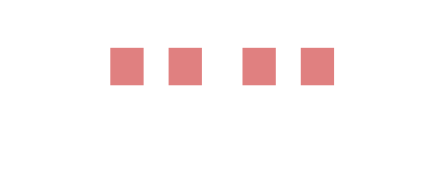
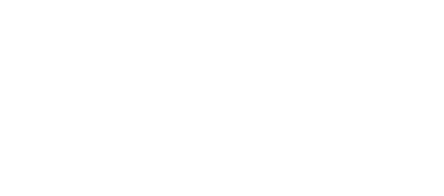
part: (156, 66) -> none
part: (288, 66) -> none

